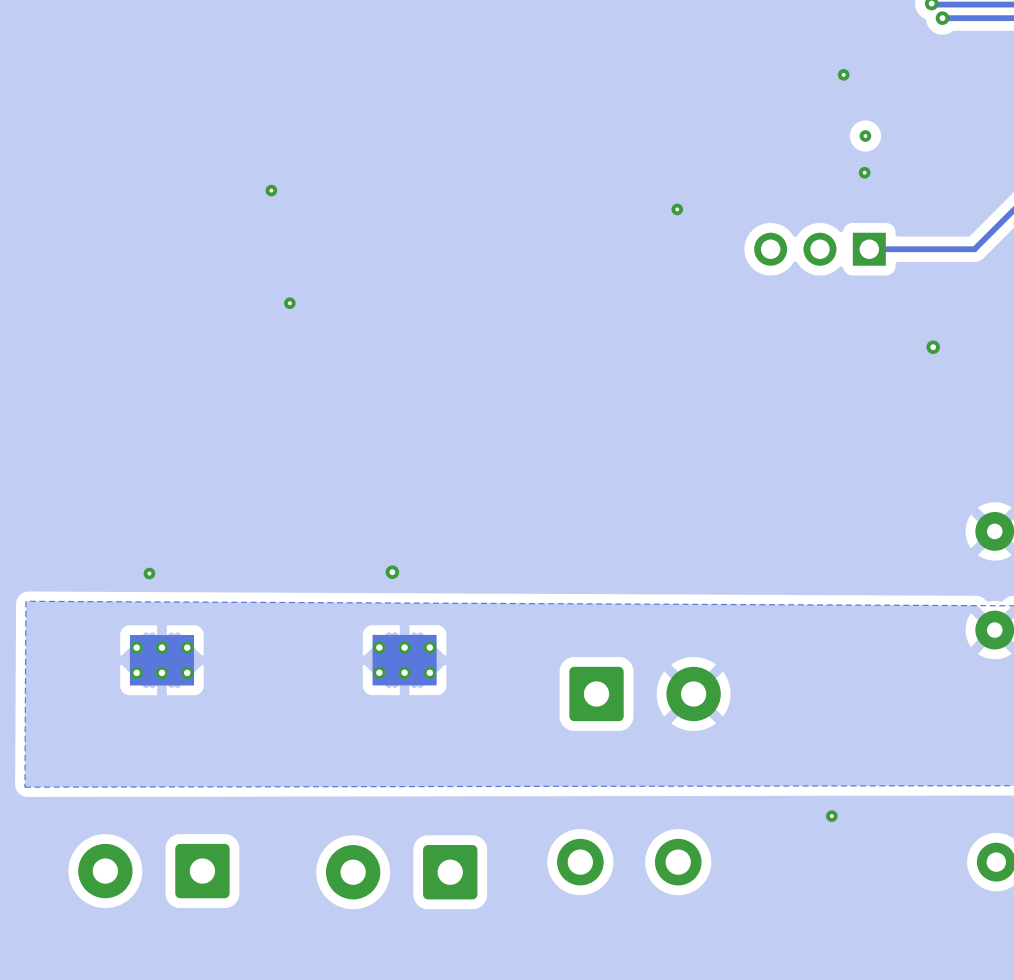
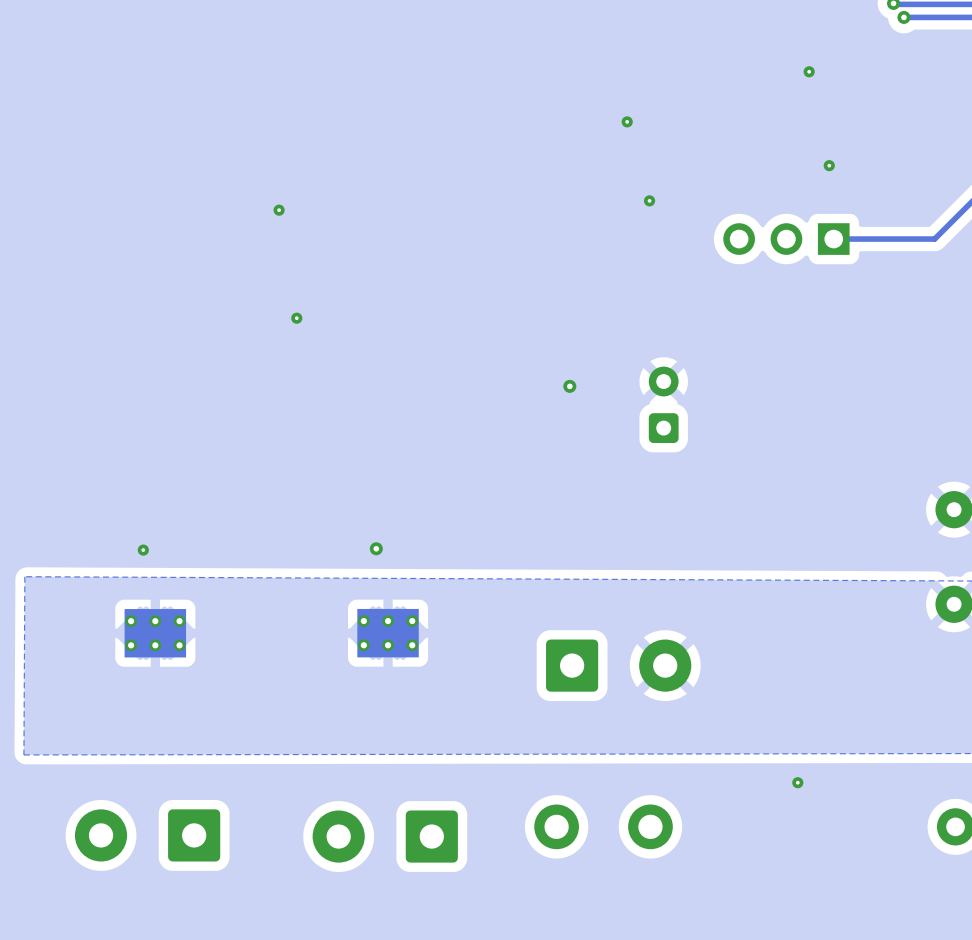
via: none -> (627, 121)
via: (865, 136) -> none
via position: (271, 190) -> (279, 210)
via position: (289, 303) -> (296, 318)
via: (933, 347) -> none
via: none -> (569, 386)
part: none -> (663, 404)

